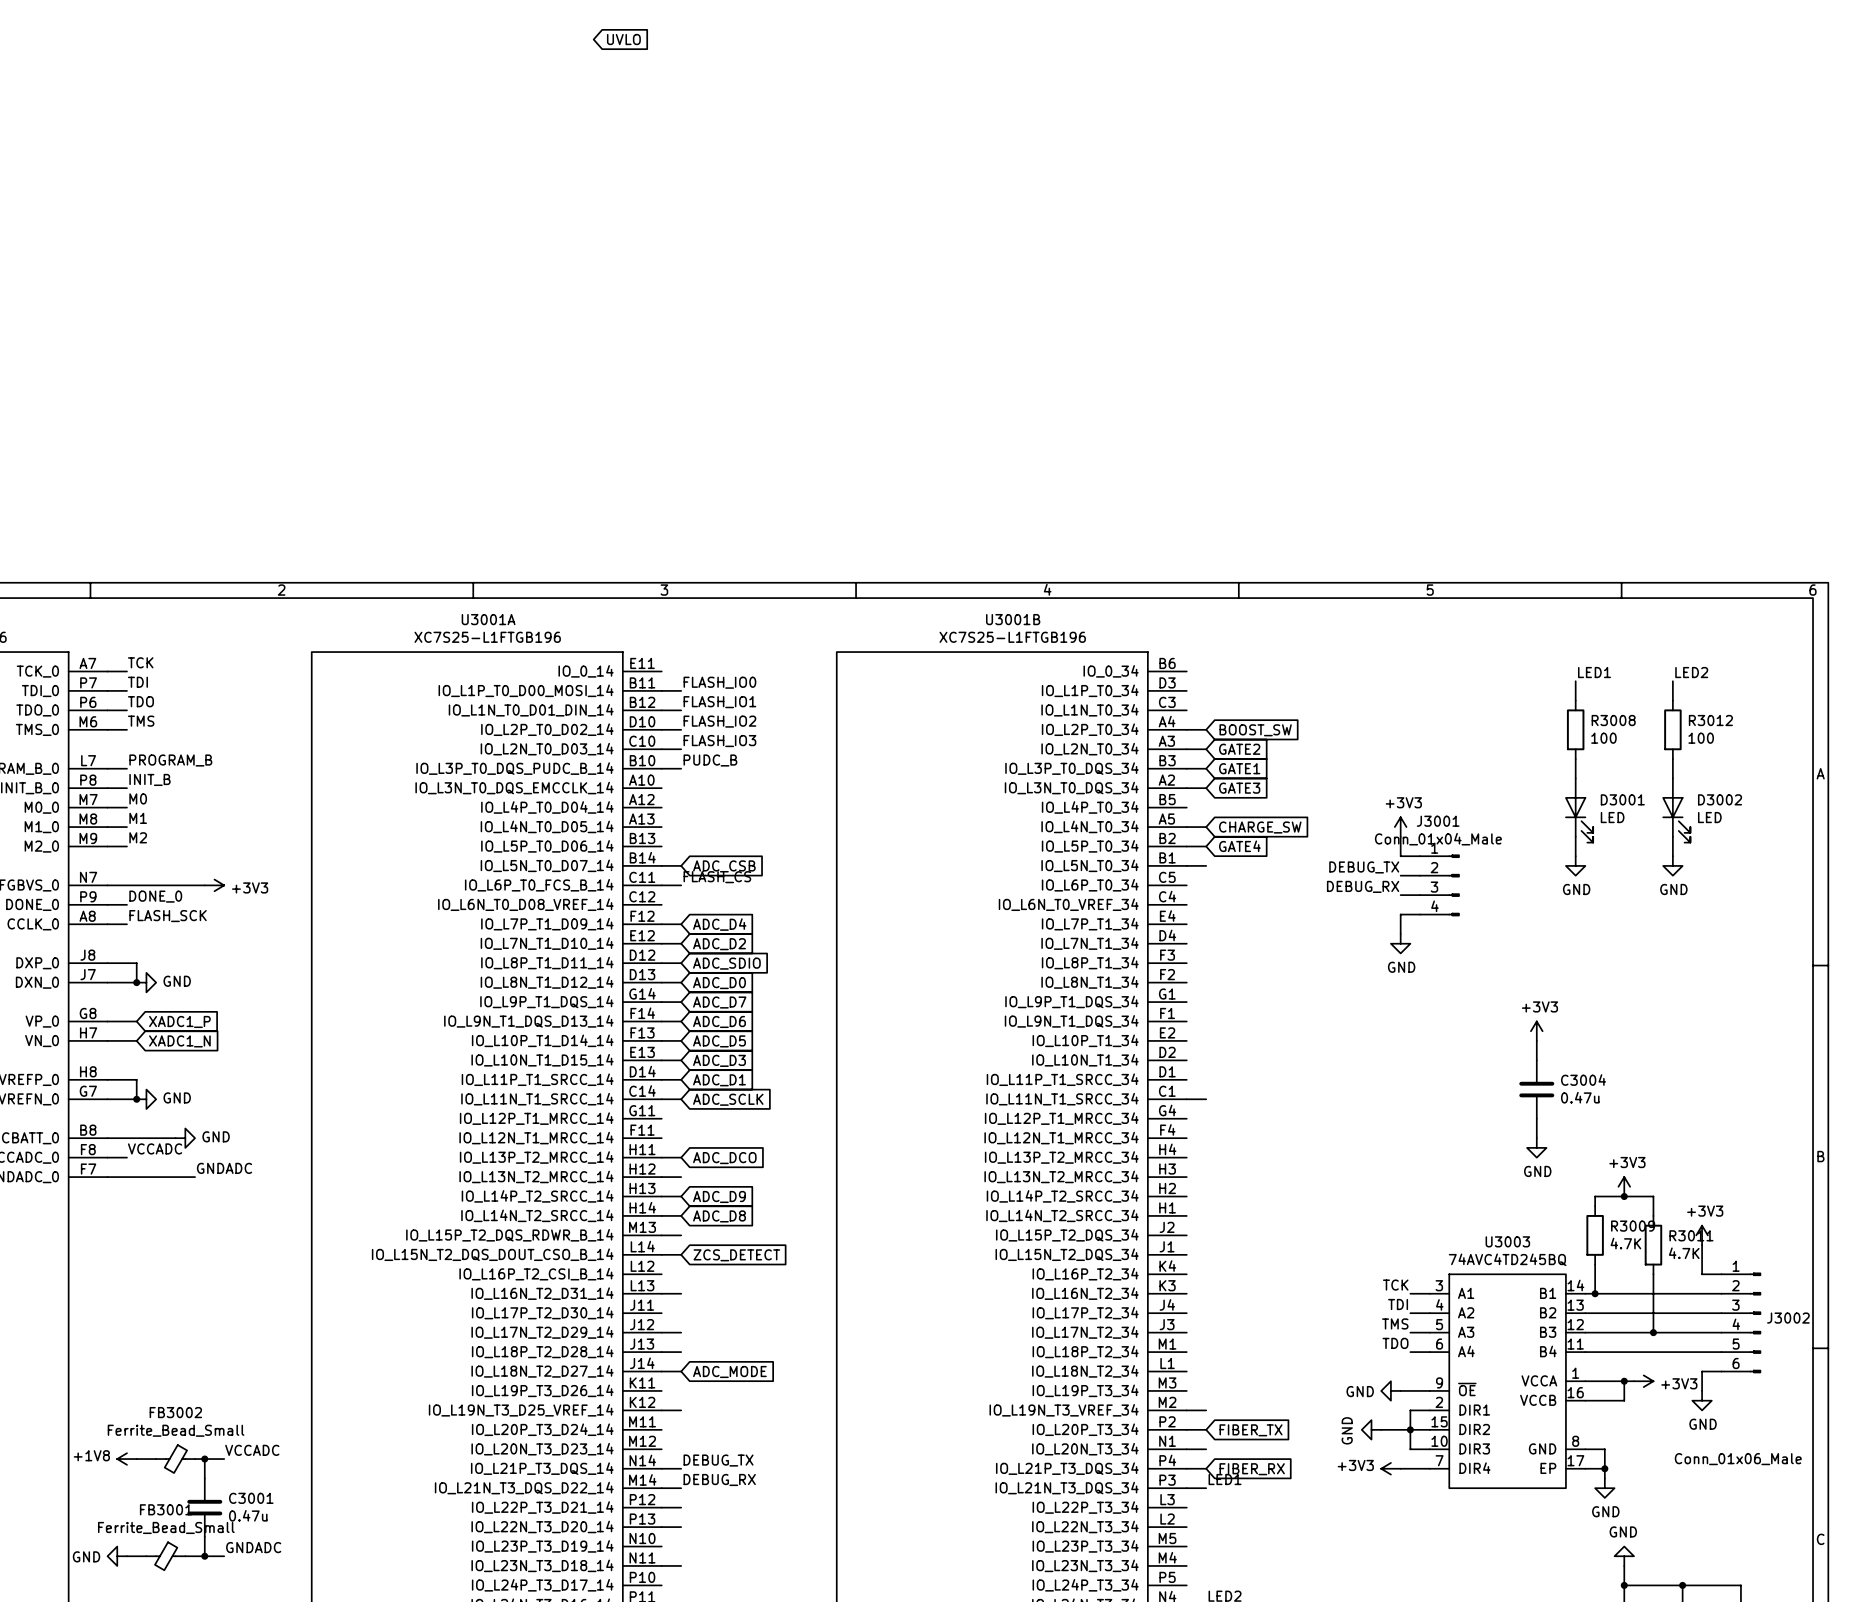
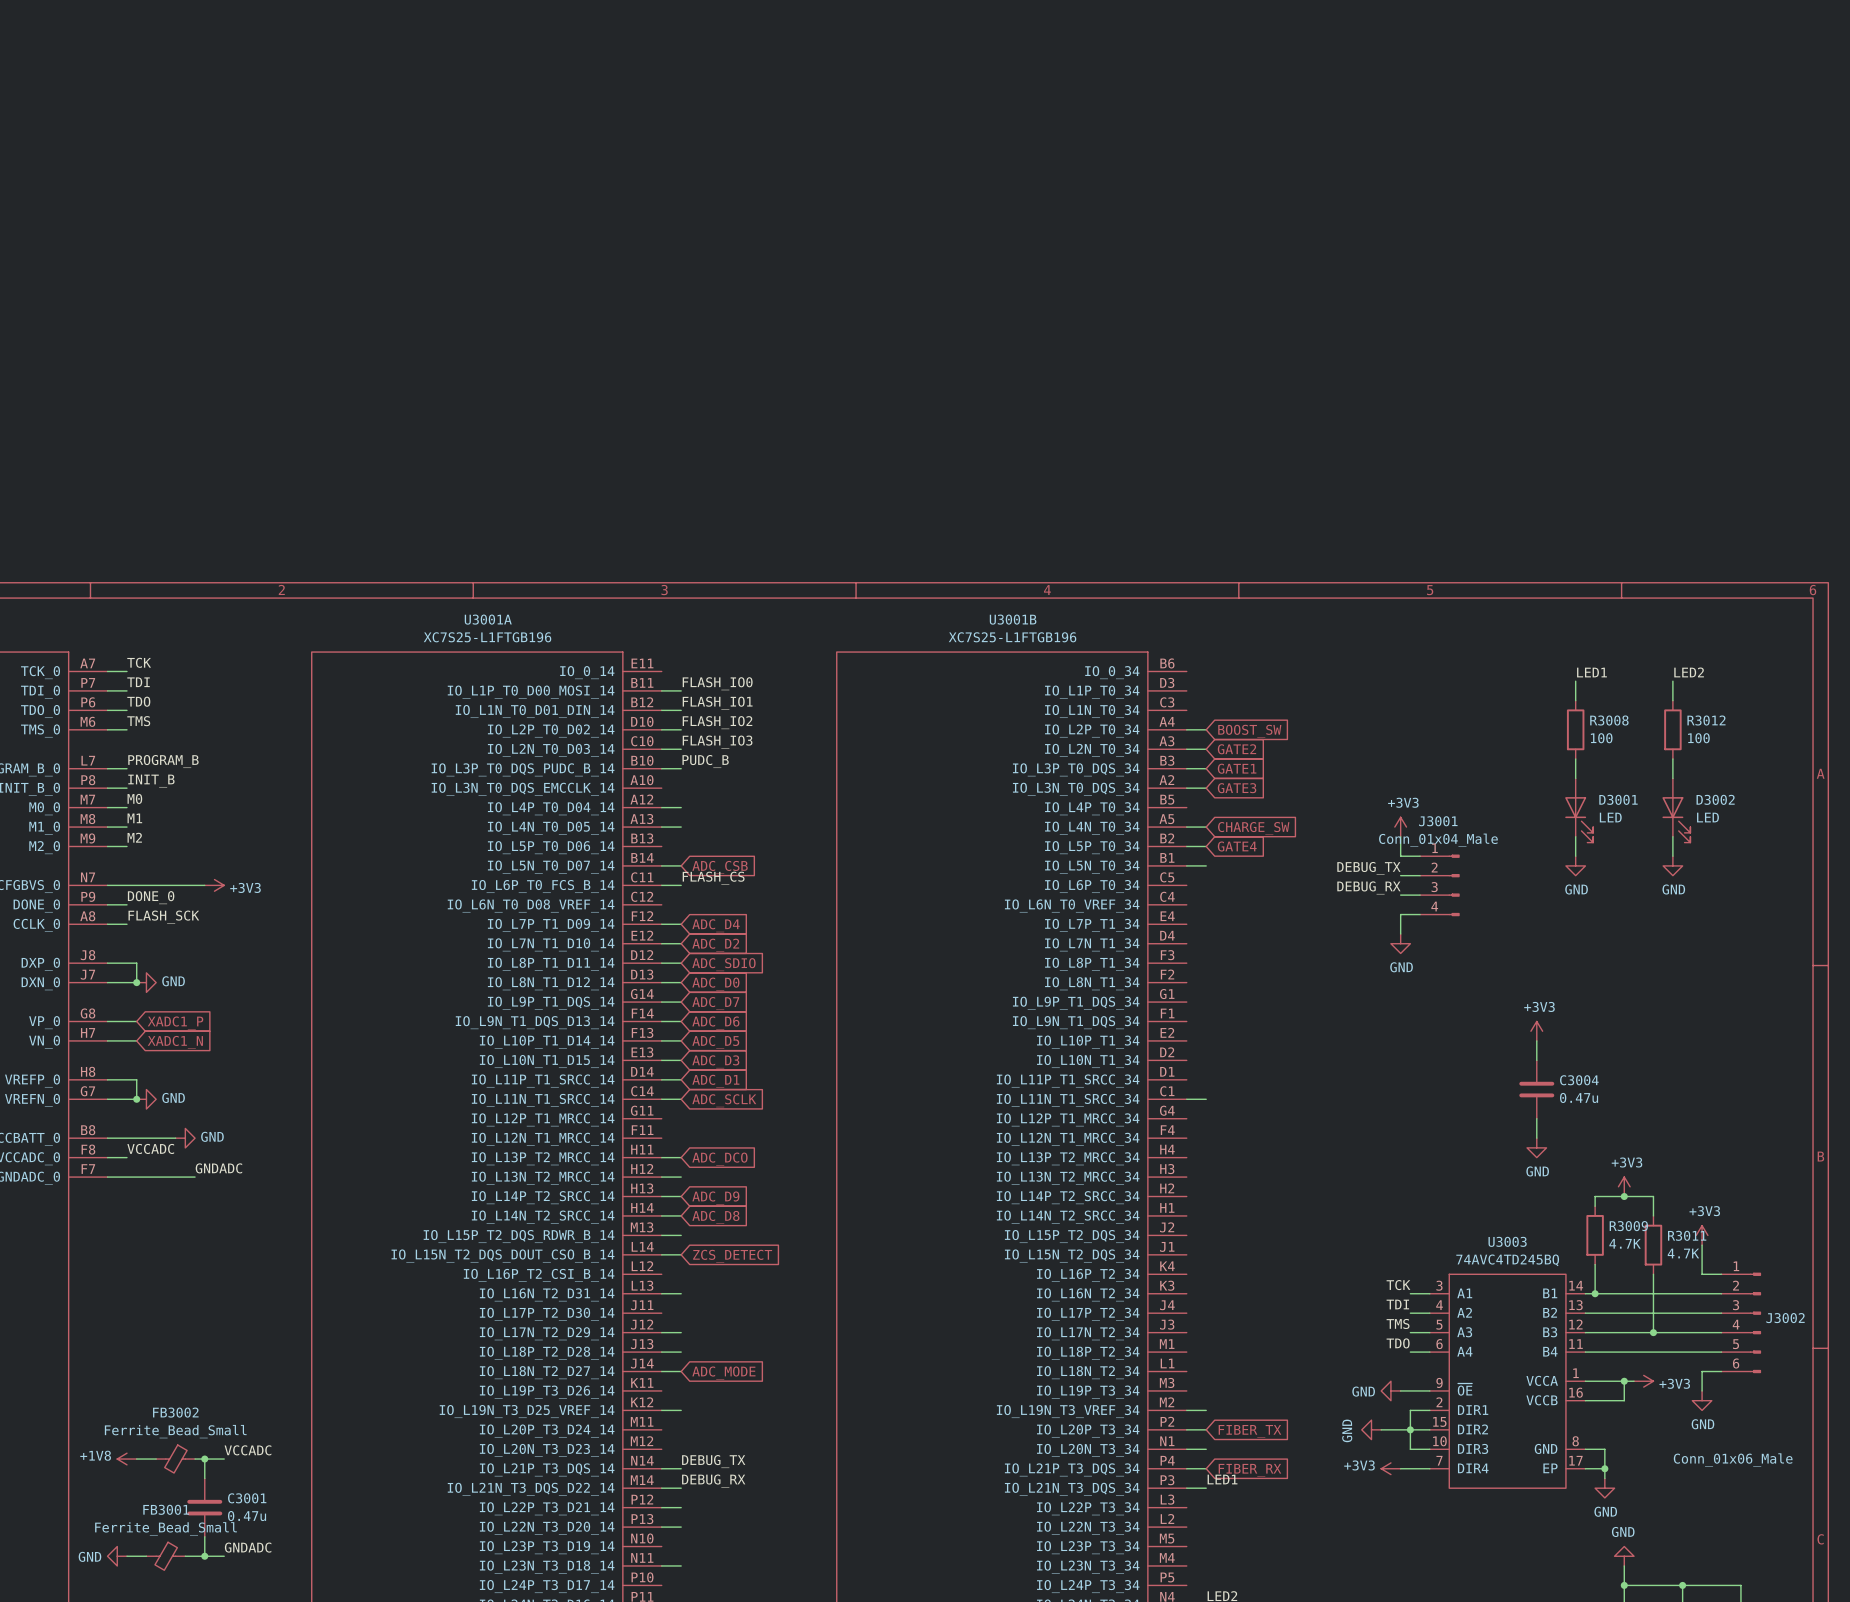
global label: UVLO (623, 39) -> none
wire: none -> (661, 807) (681, 807)
wire: none -> (661, 827) (681, 827)

